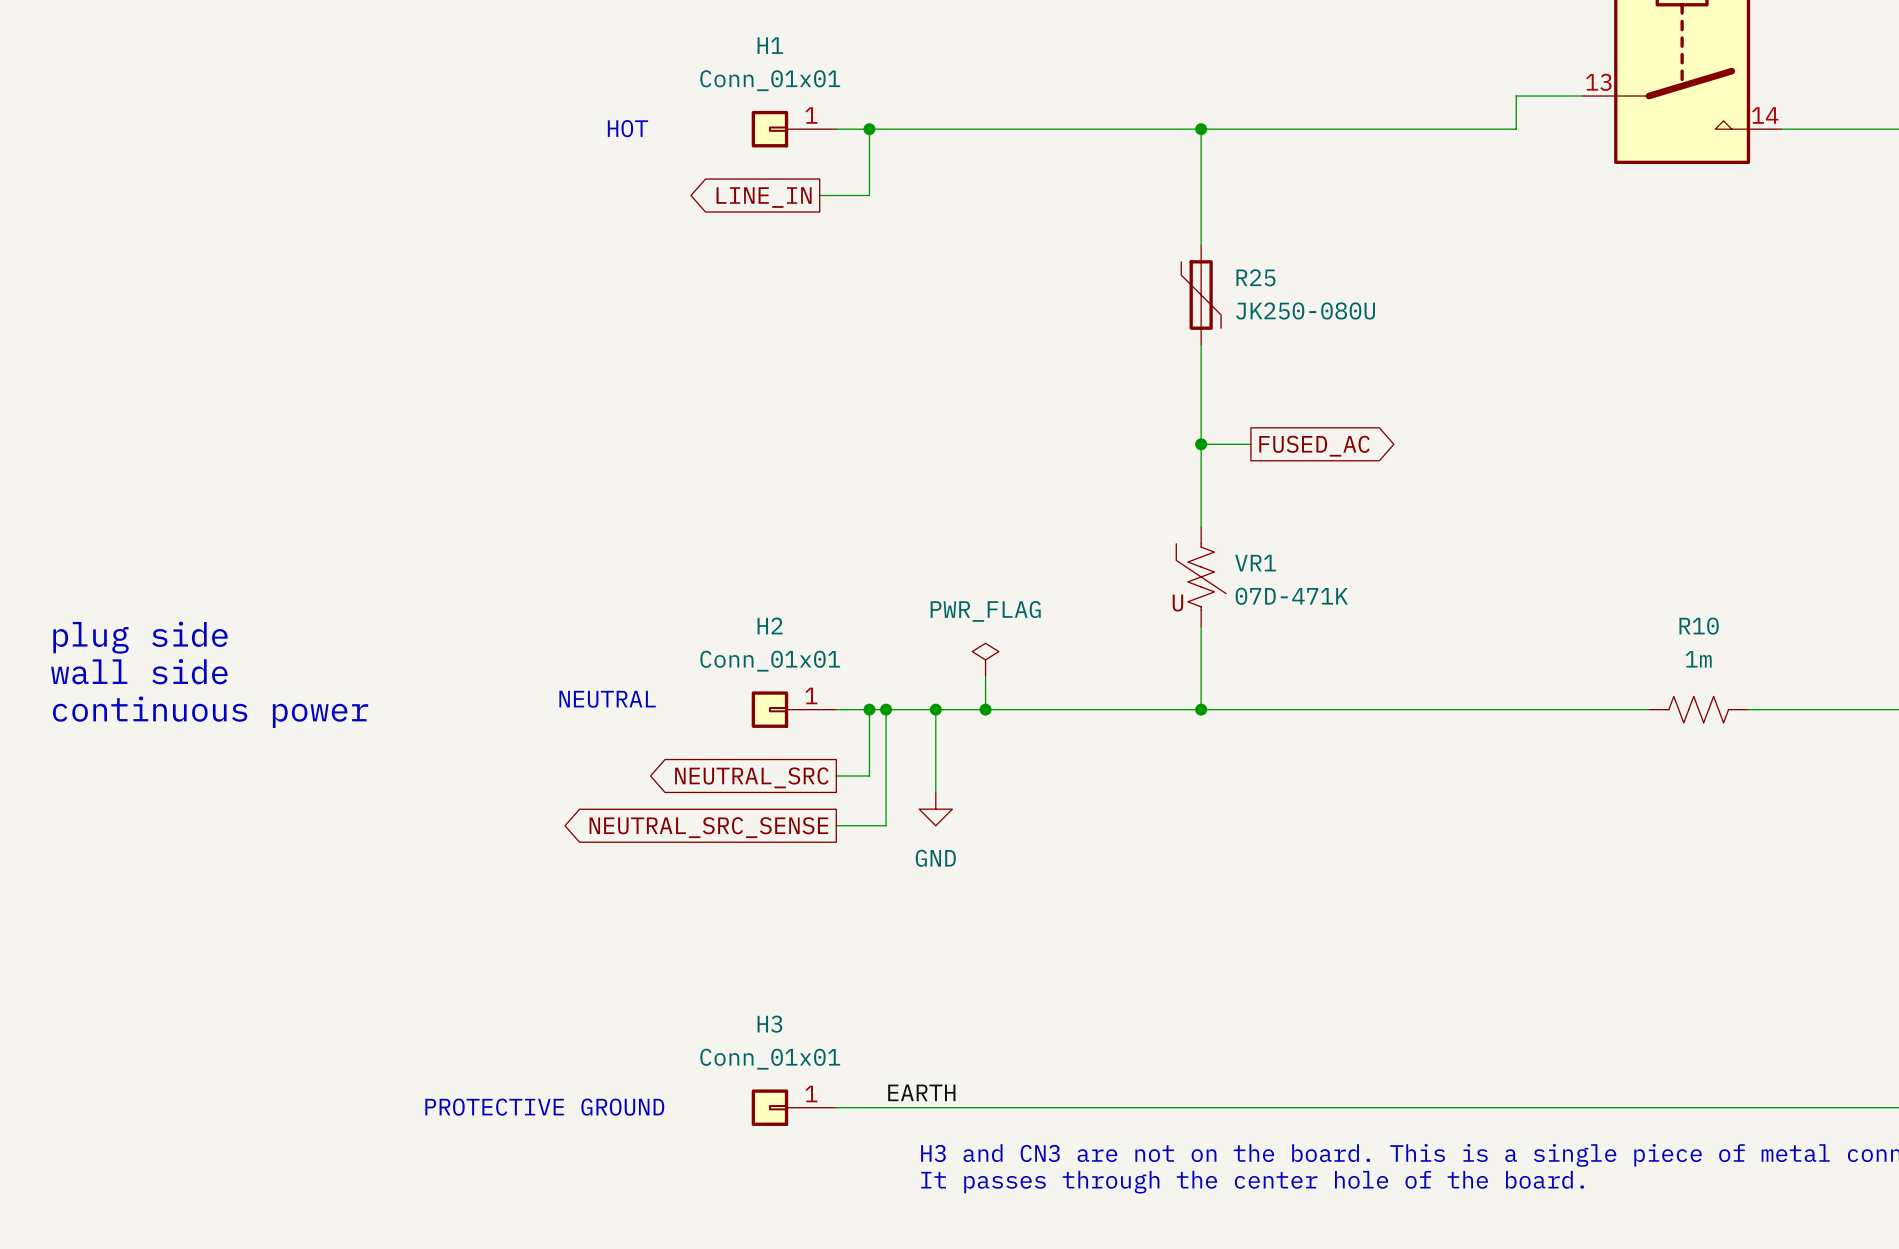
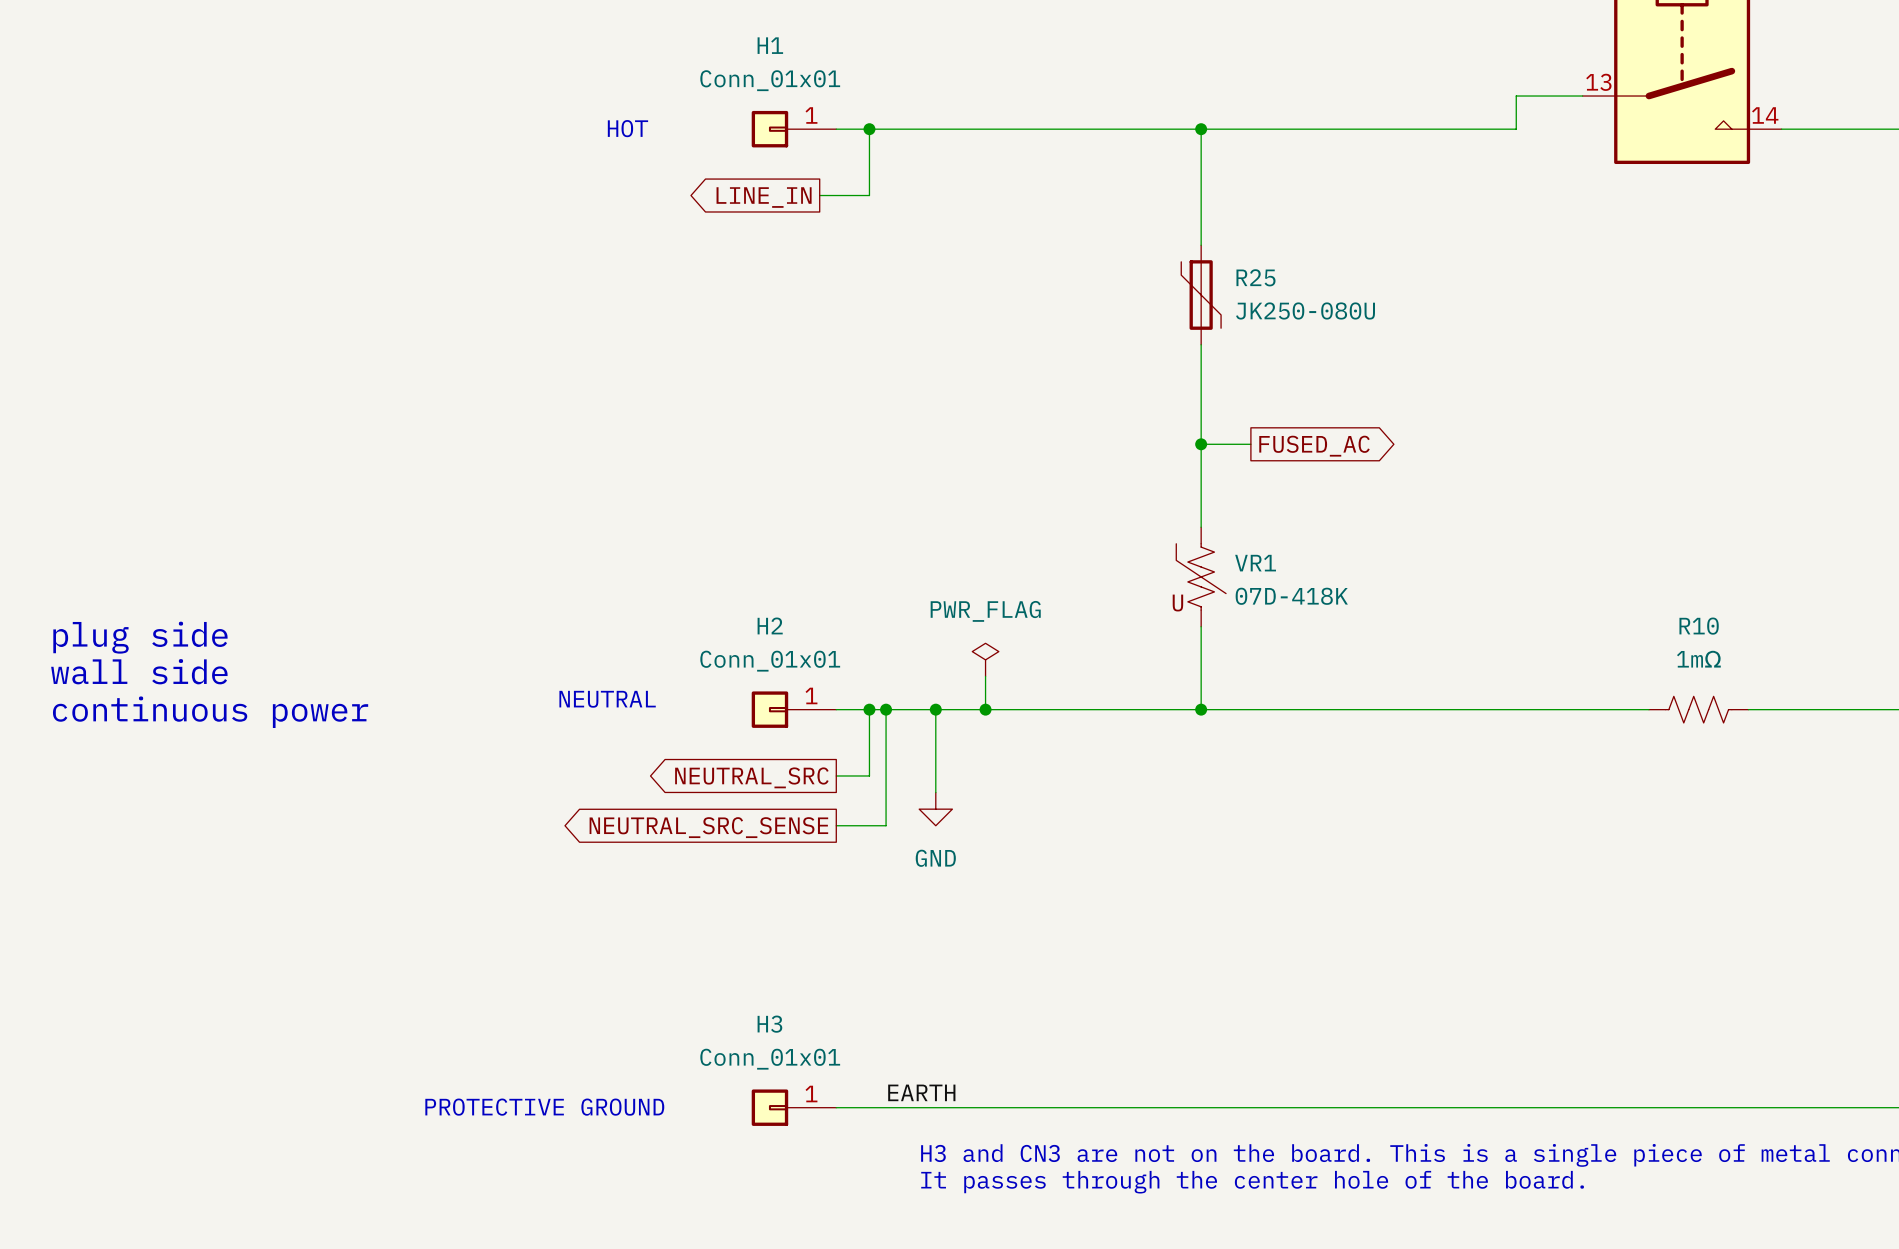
VR1 value: 07D-471K (1291, 596) -> 07D-418K (1291, 596)
R10 value: 1m (1698, 659) -> 1mΩ (1698, 659)

